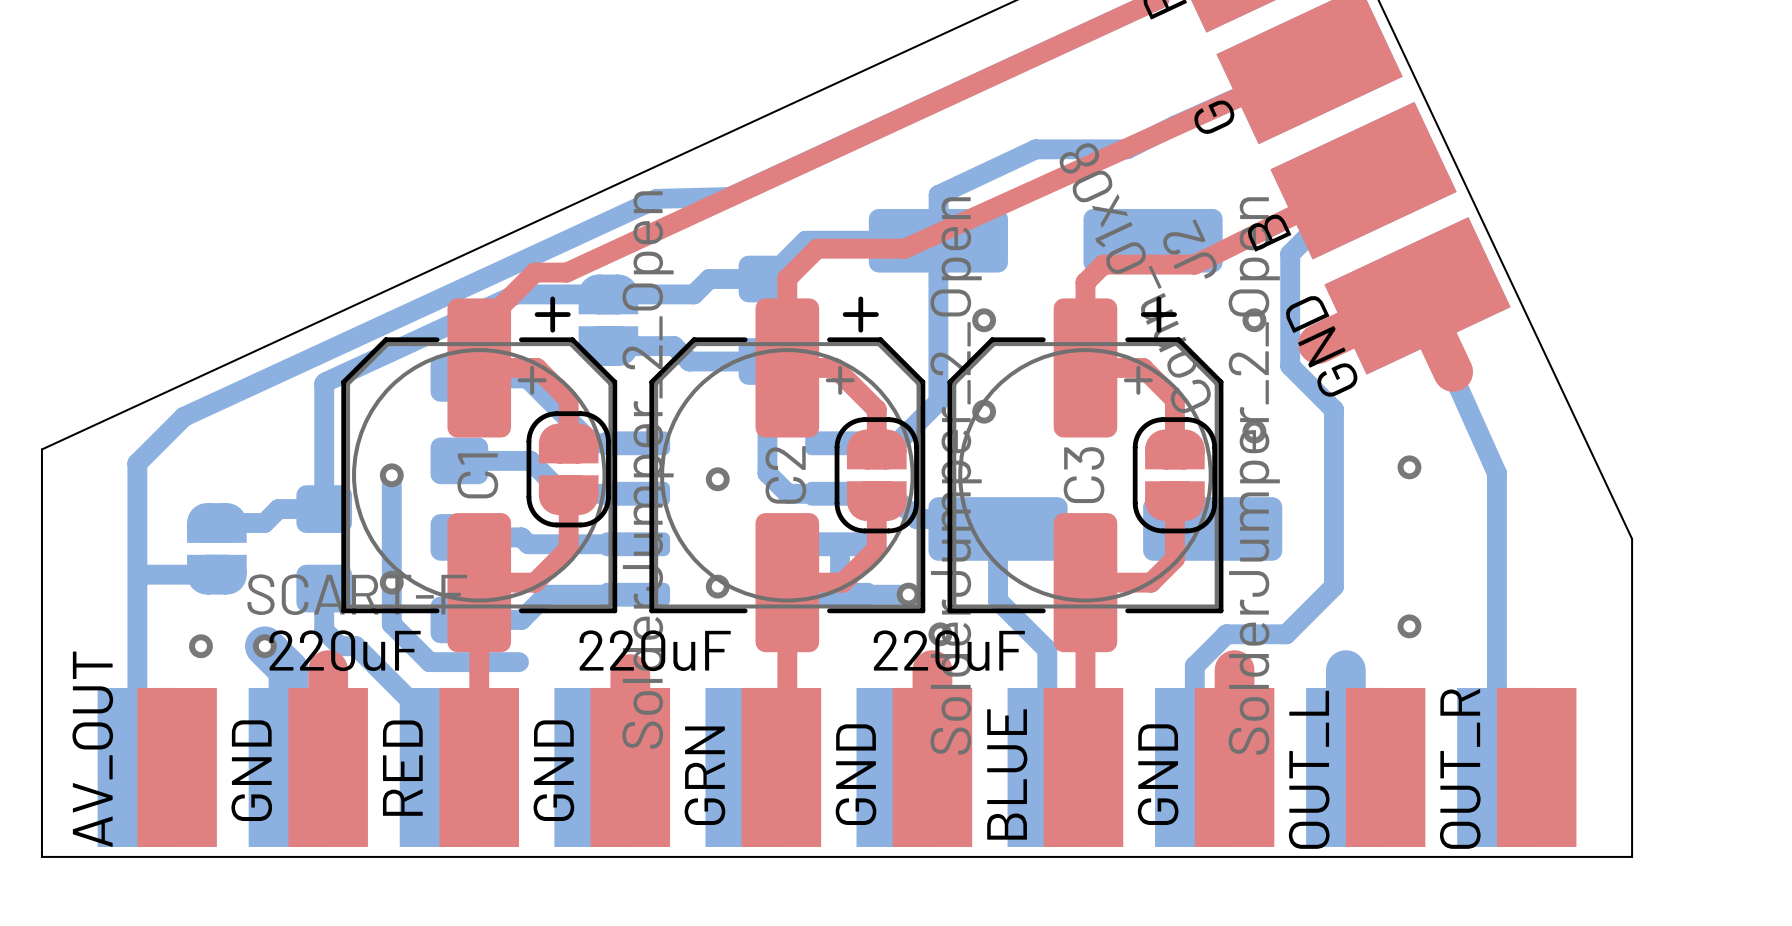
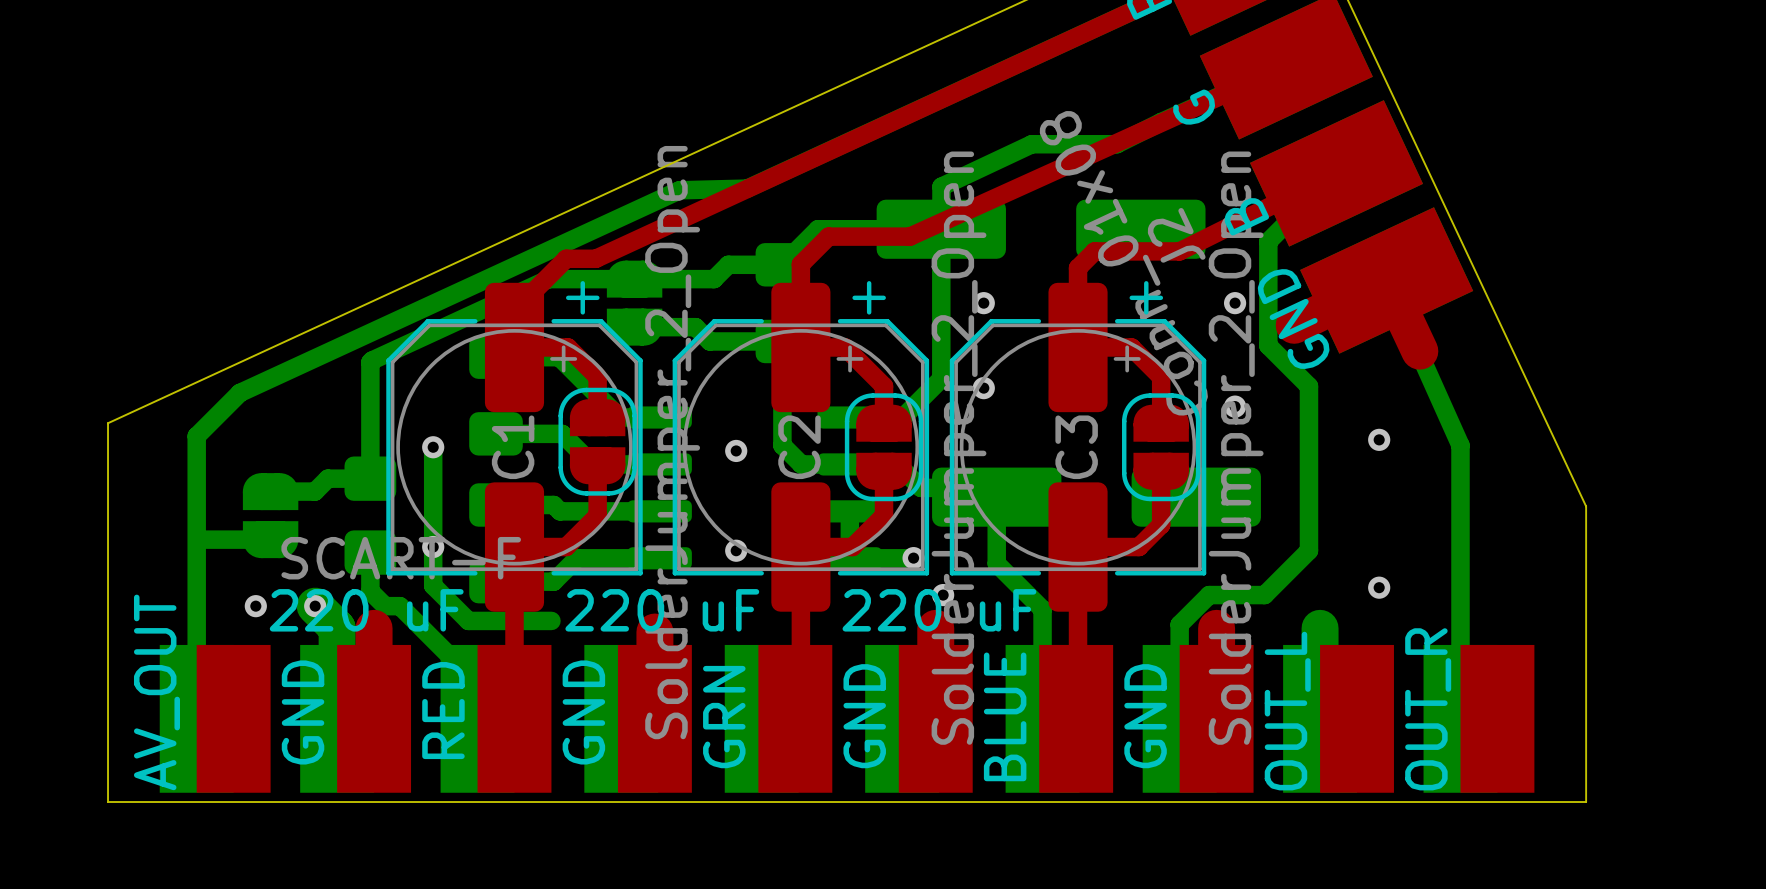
C1 value: 220uF (345, 650) -> 220 uF (366, 610)
C2 value: 220uF (655, 650) -> 220 uF (662, 610)
C3 value: 220uF (949, 650) -> 220 uF (939, 610)

